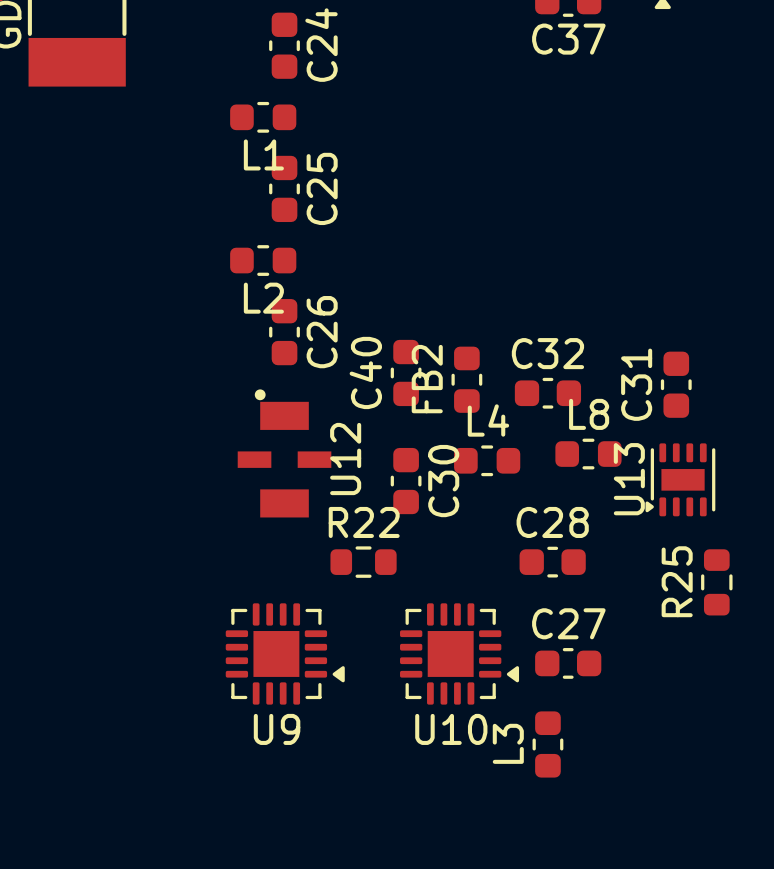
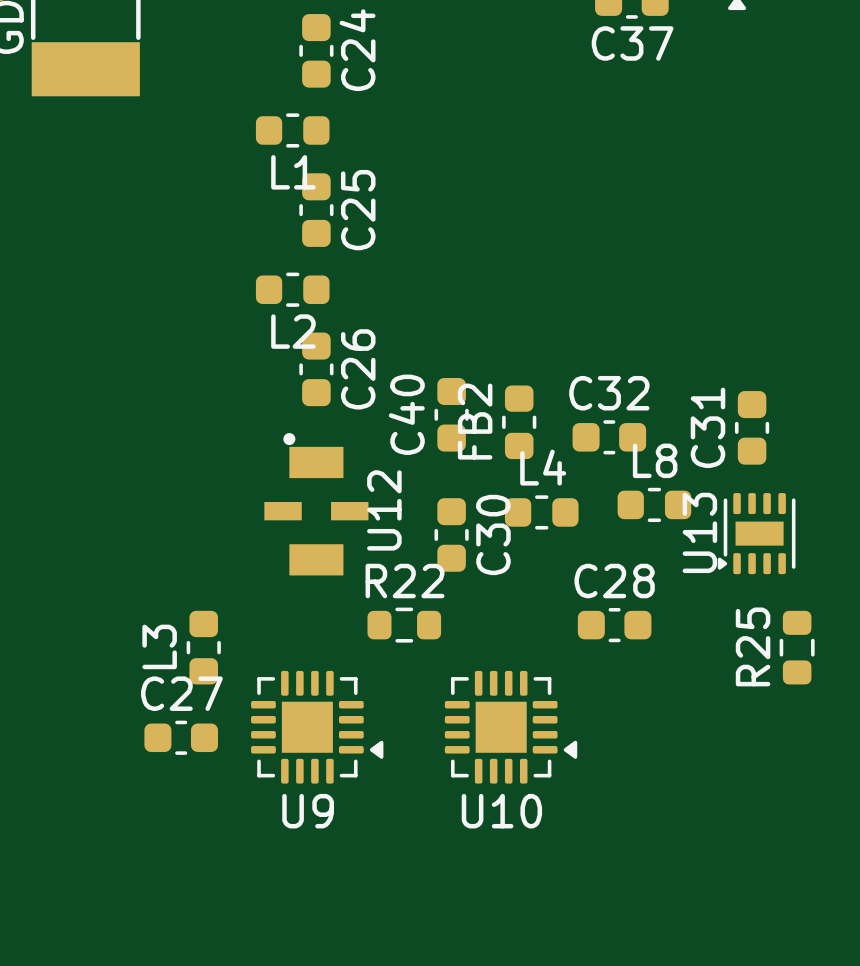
C27 position: (568, 663) -> (181, 737)
L3 position: (547, 744) -> (203, 647)

